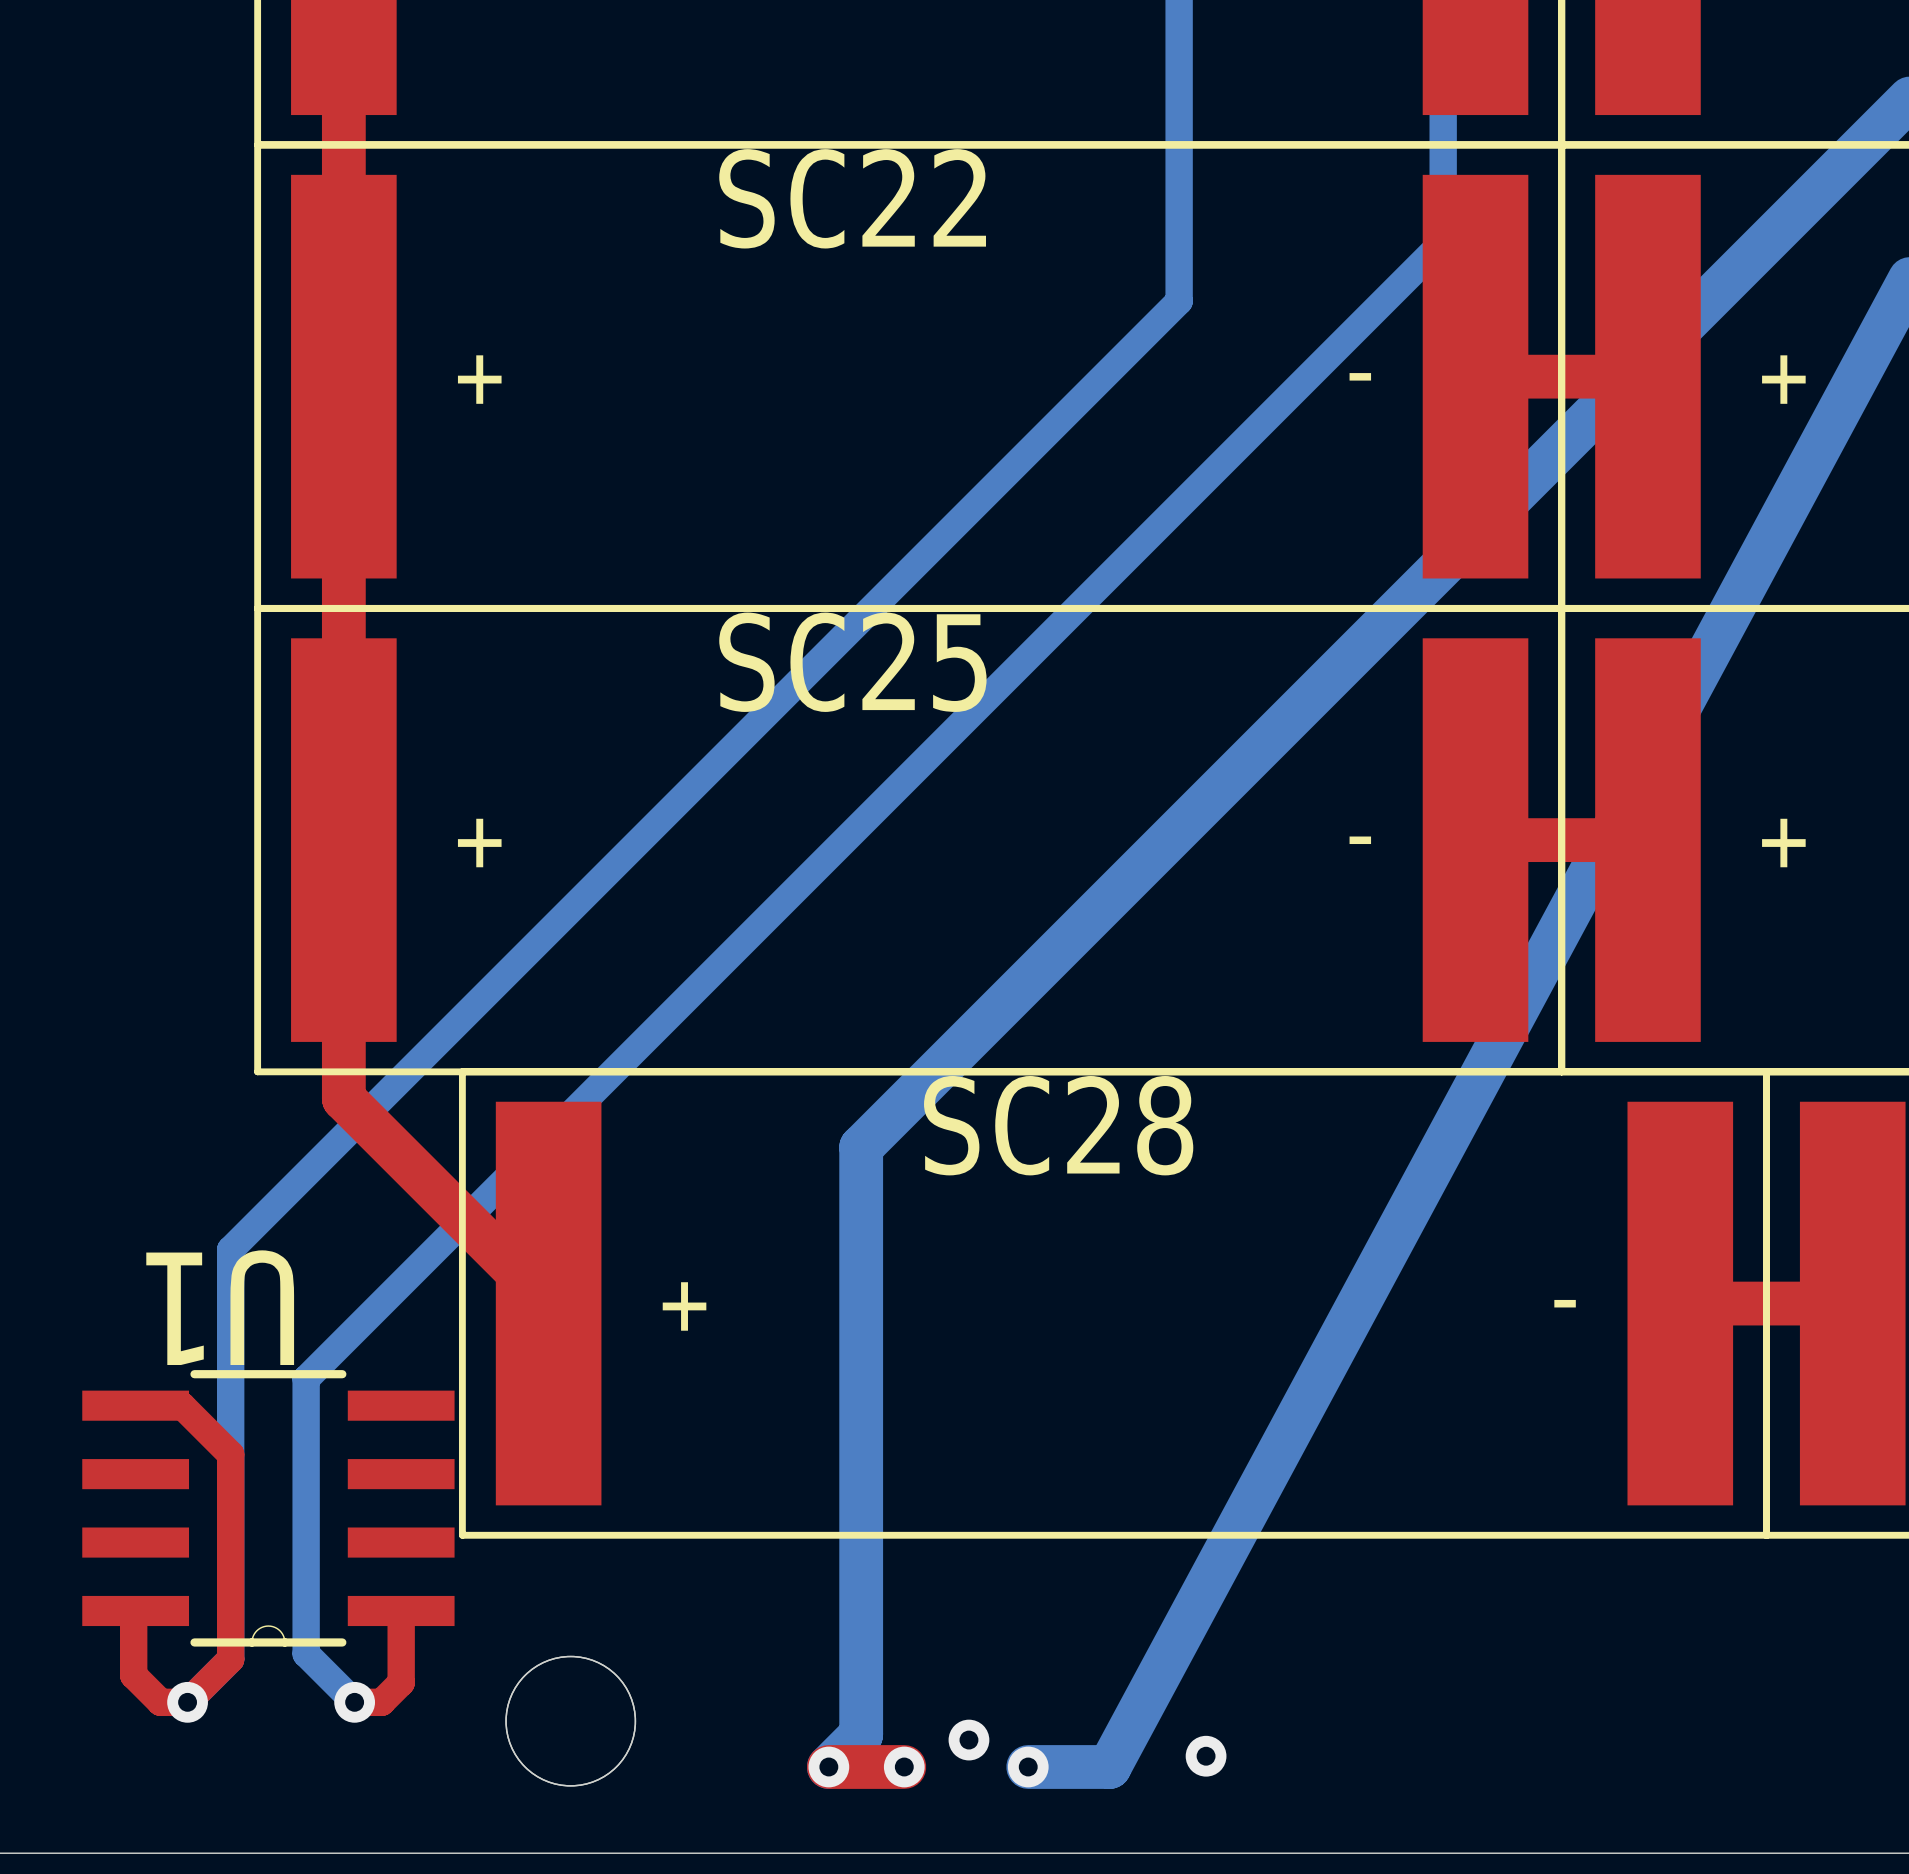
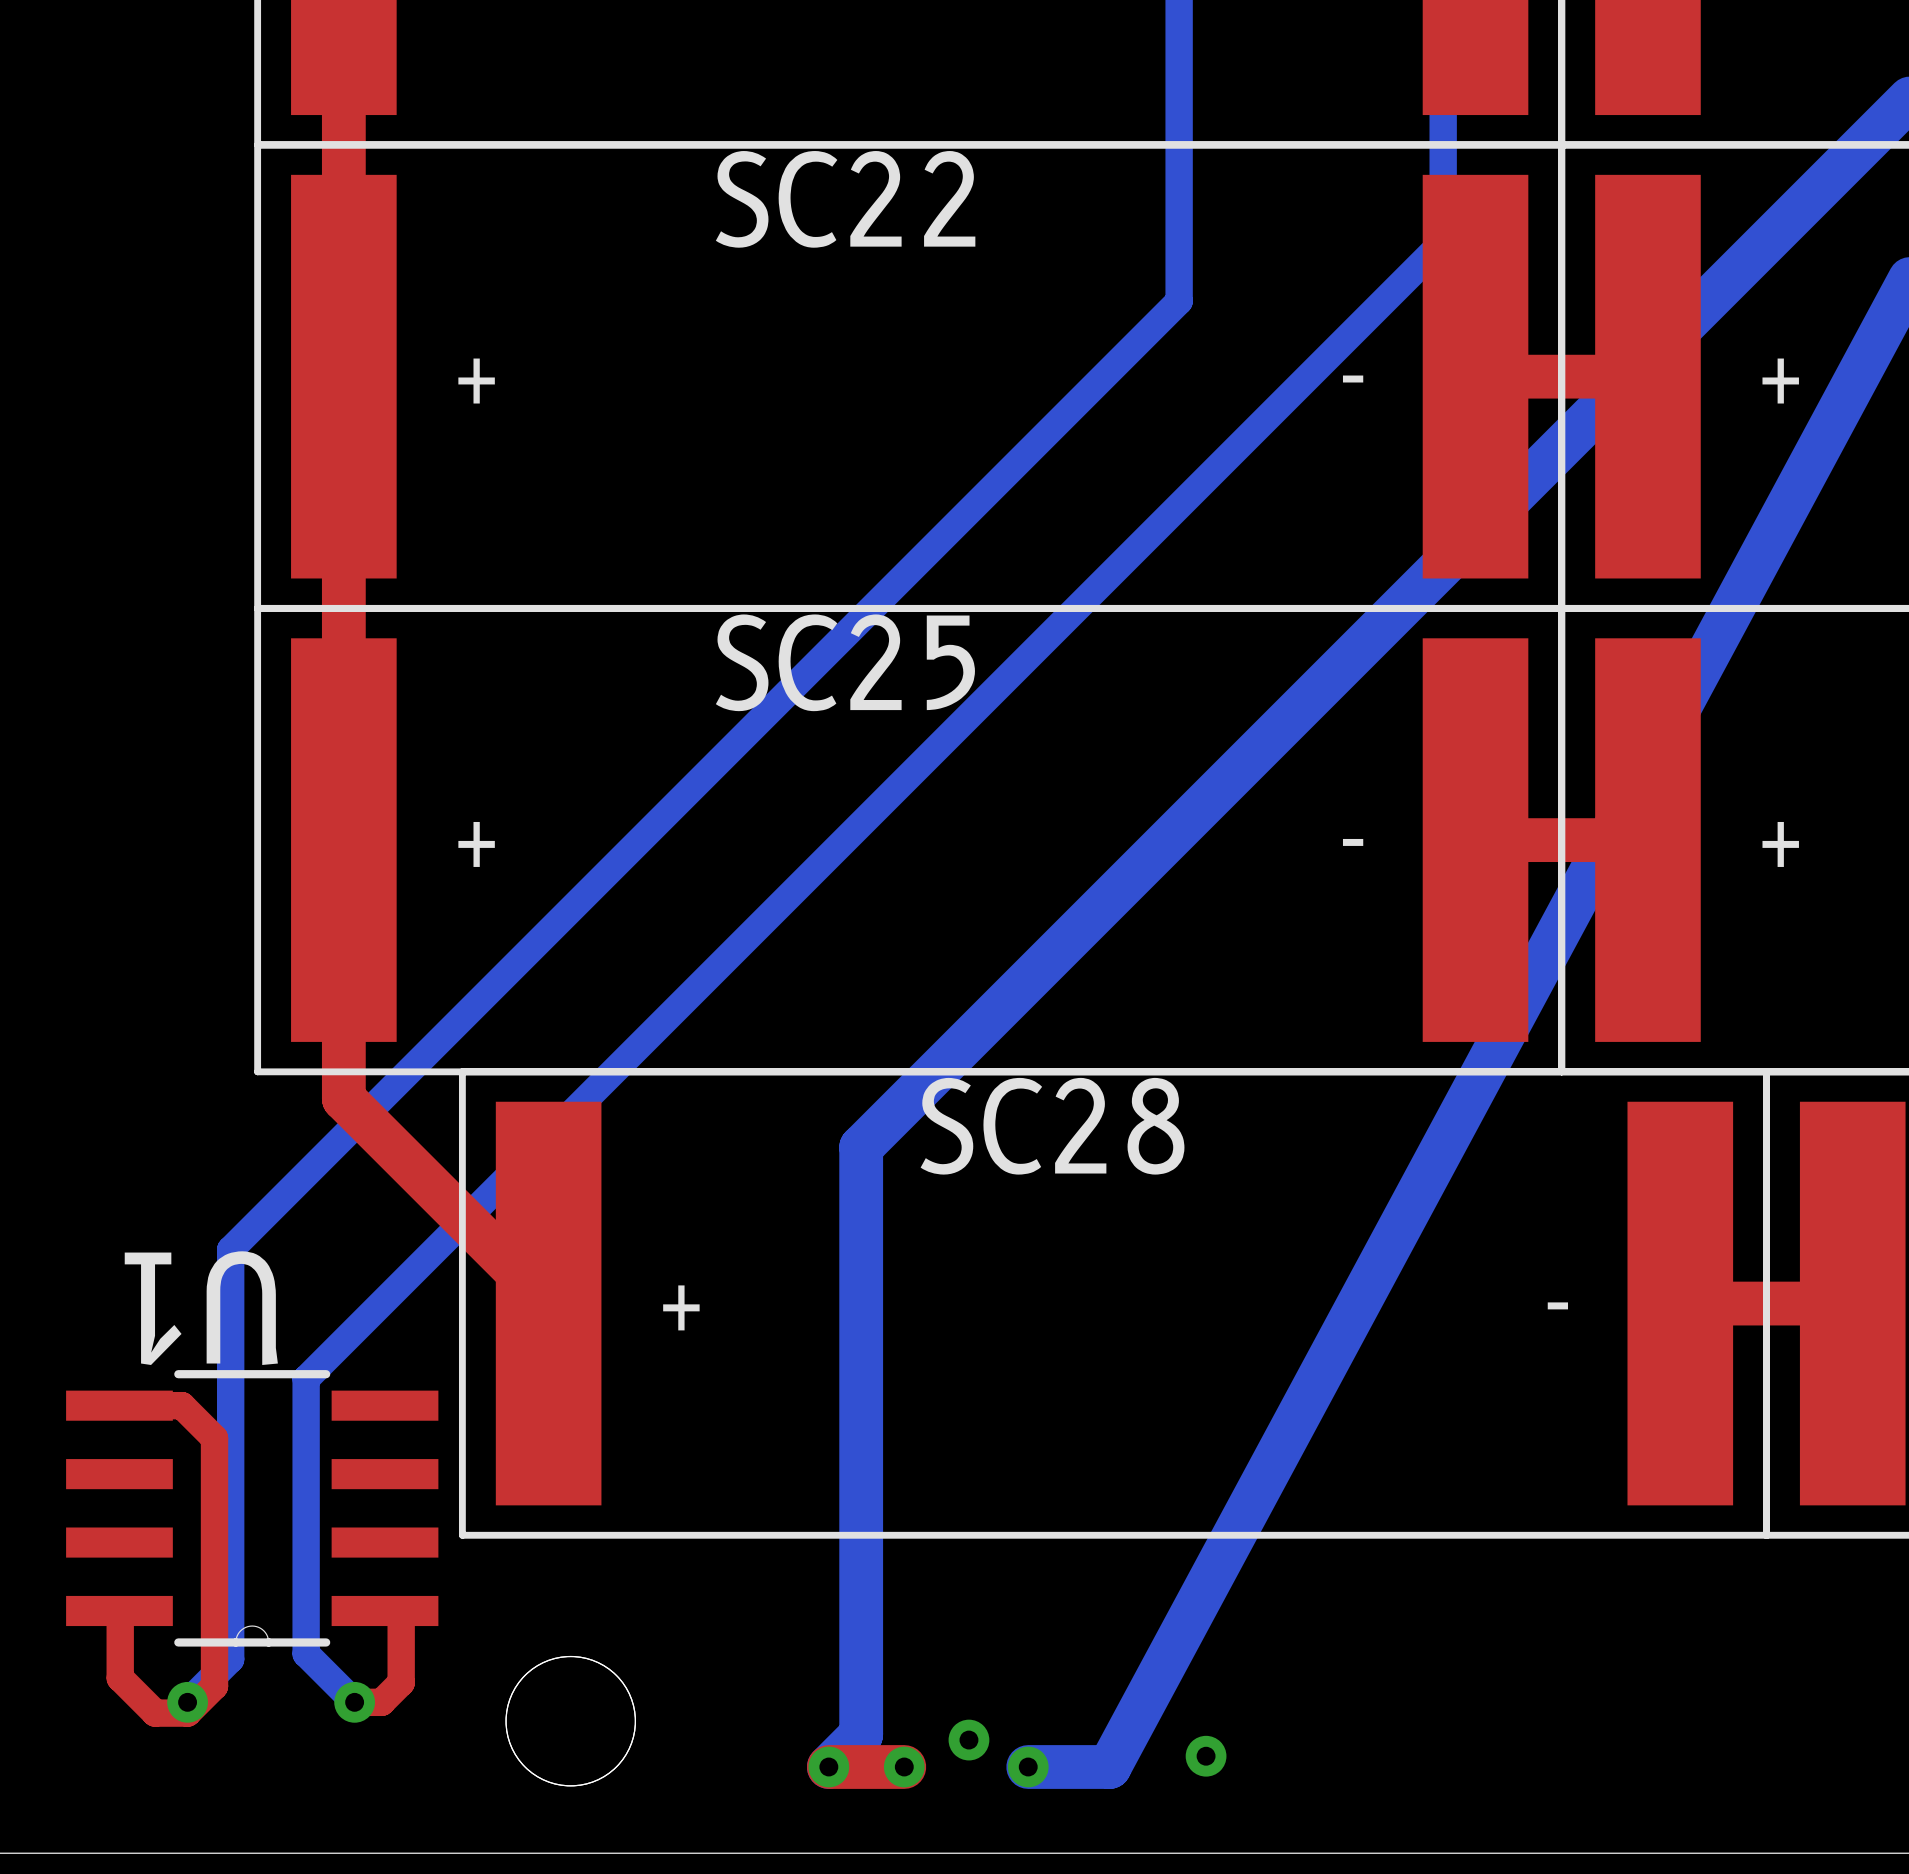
top track: (214, 1438) (230, 1454) (230, 1659) (187, 1702) (160, 1702) (133, 1675) (133, 1612) (135, 1610) -> (214, 1438) (214, 1686) (187, 1713) (155, 1713) (120, 1678) (120, 1611)
U1 position: (268, 1508) -> (252, 1508)

